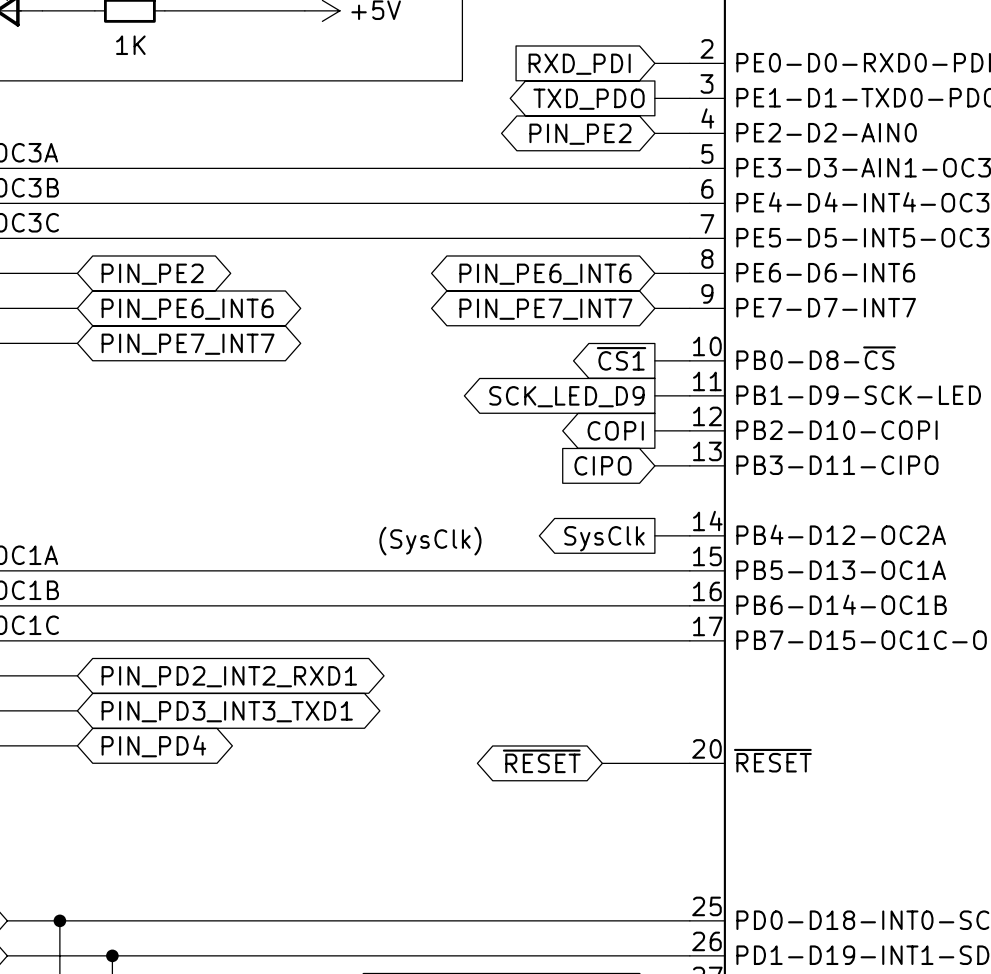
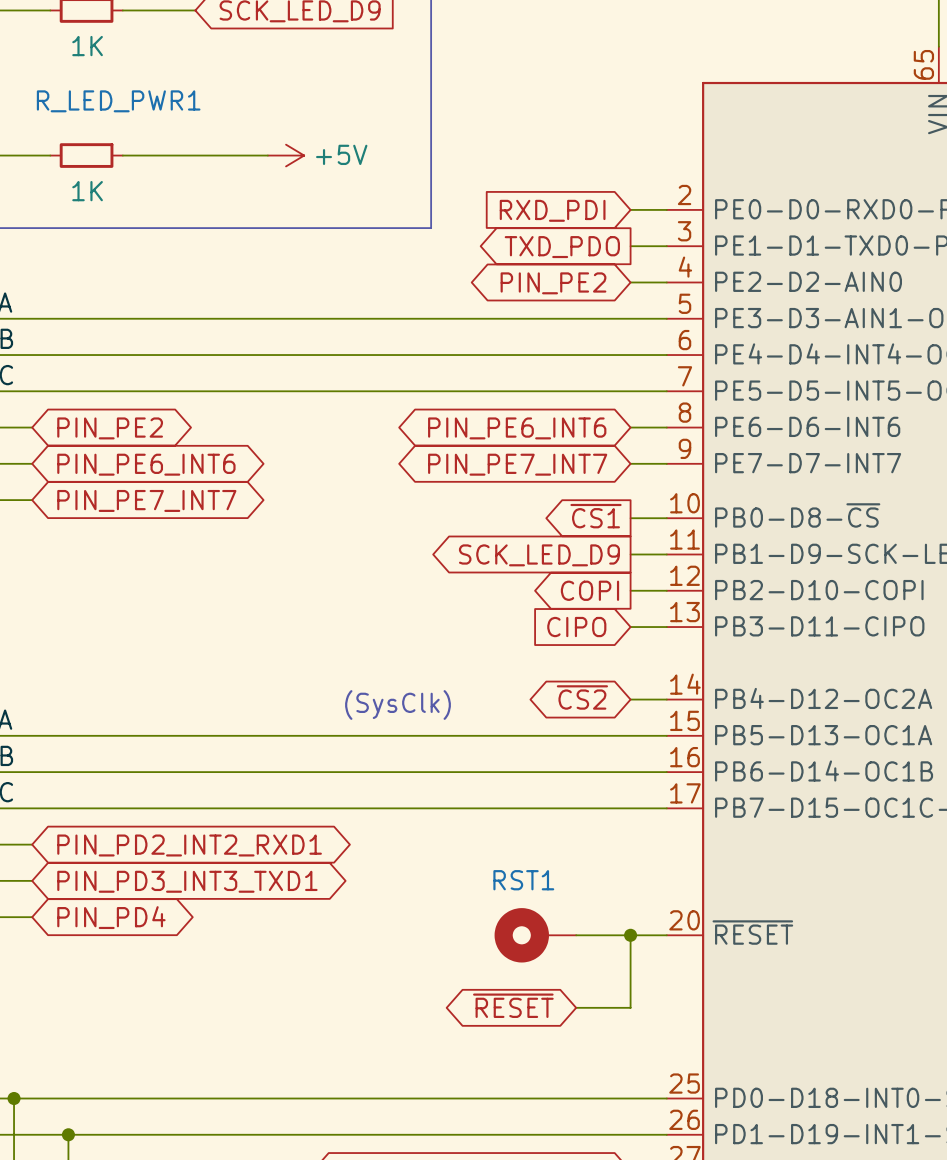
global label shape: output (604, 538) -> bidirectional (582, 697)
global label: SysClk (604, 538) -> ~{CS2} (582, 697)
global label position: ~{RESET} (541, 761) -> ~{RESET} (513, 1005)
RST1: none -> (535, 935)
wire: none -> (630, 935) (630, 1007) (576, 1007)
junction: none -> (630, 935)

